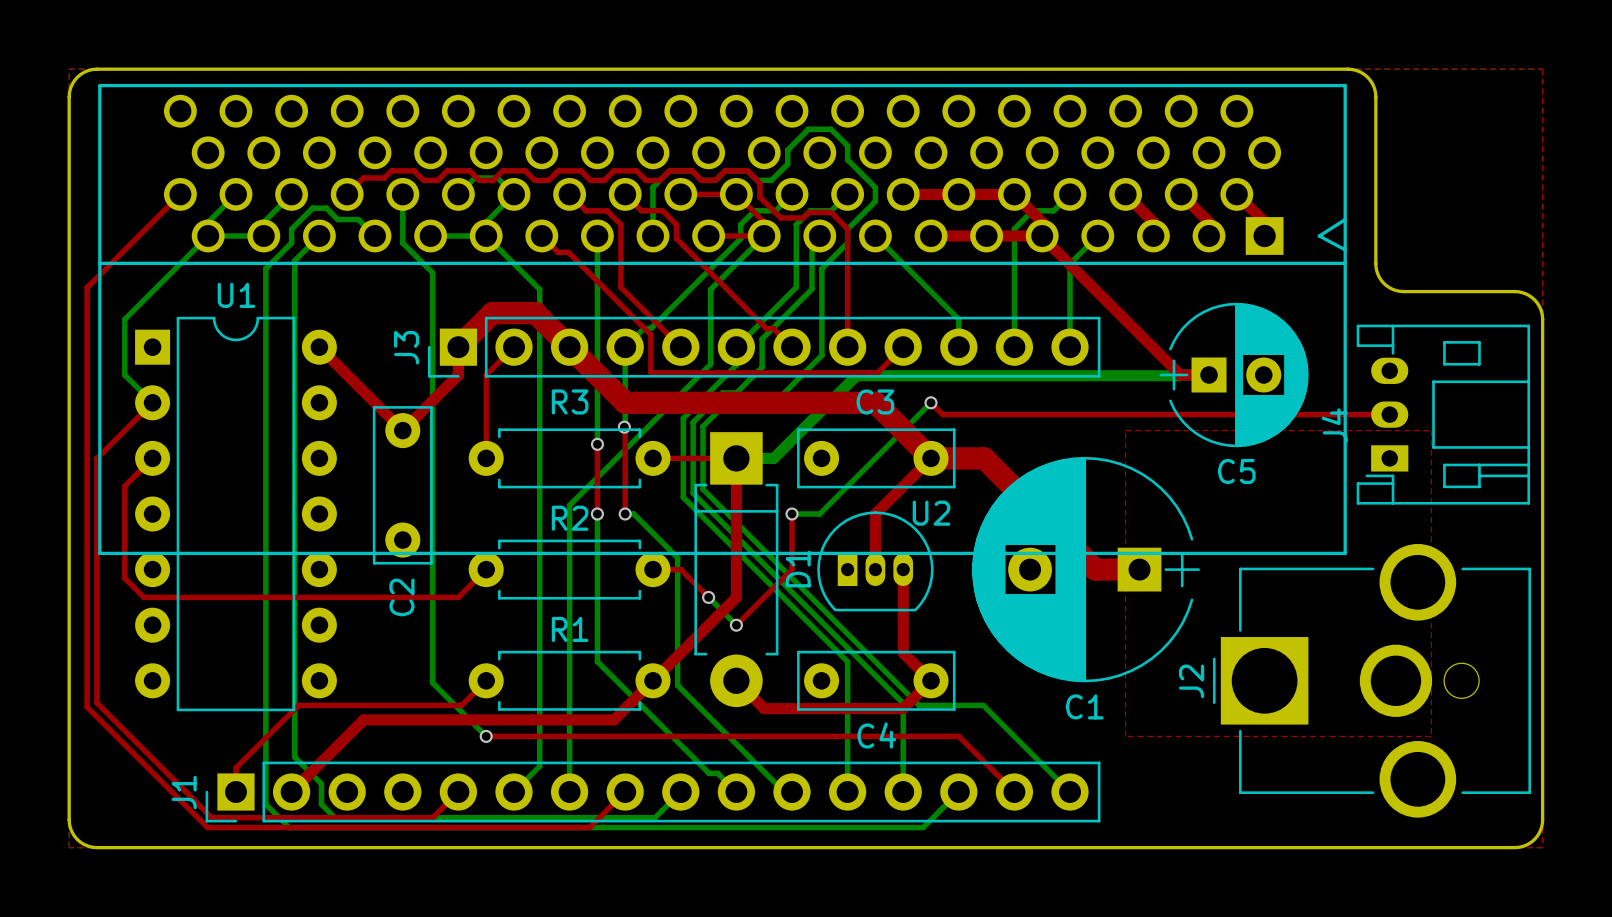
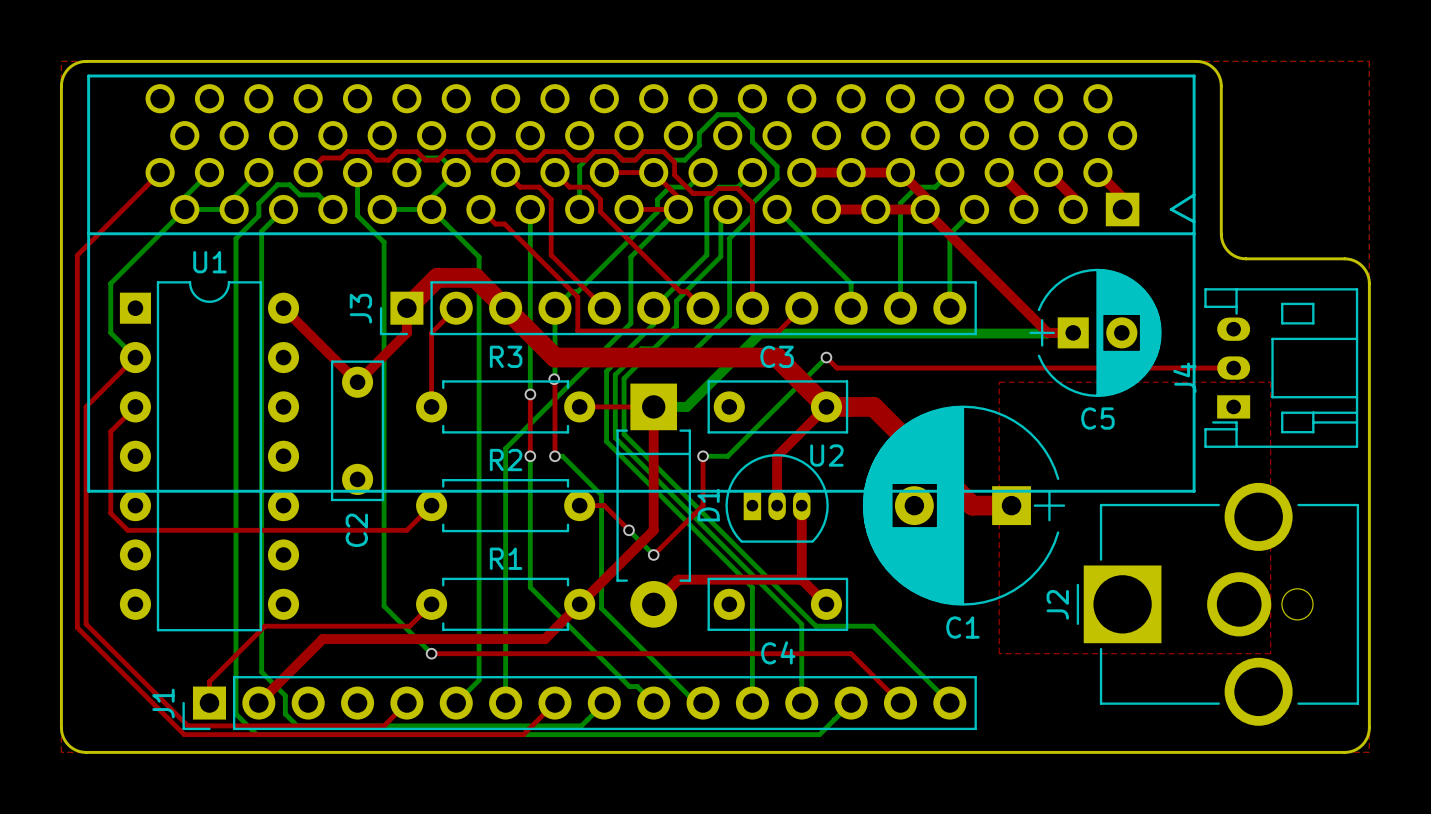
top track: (736, 680) (764, 708) (903, 708) (931, 680) -> (653, 604) (678, 579) (801, 579)

